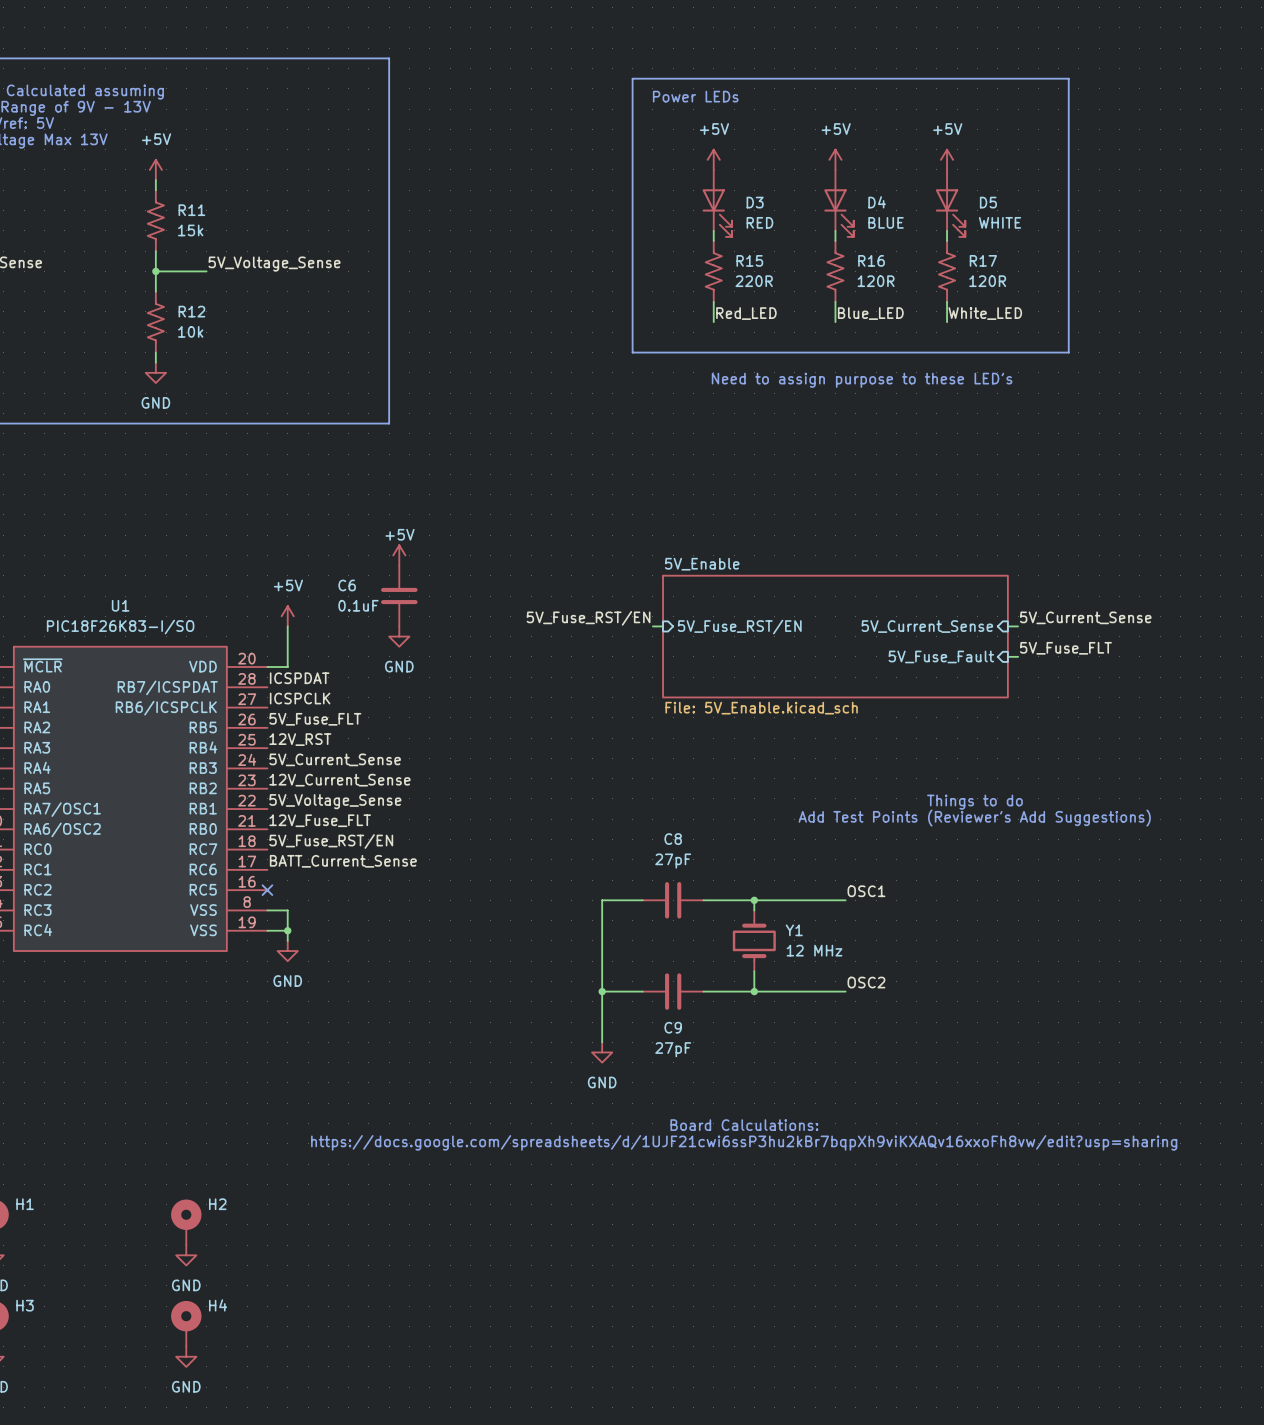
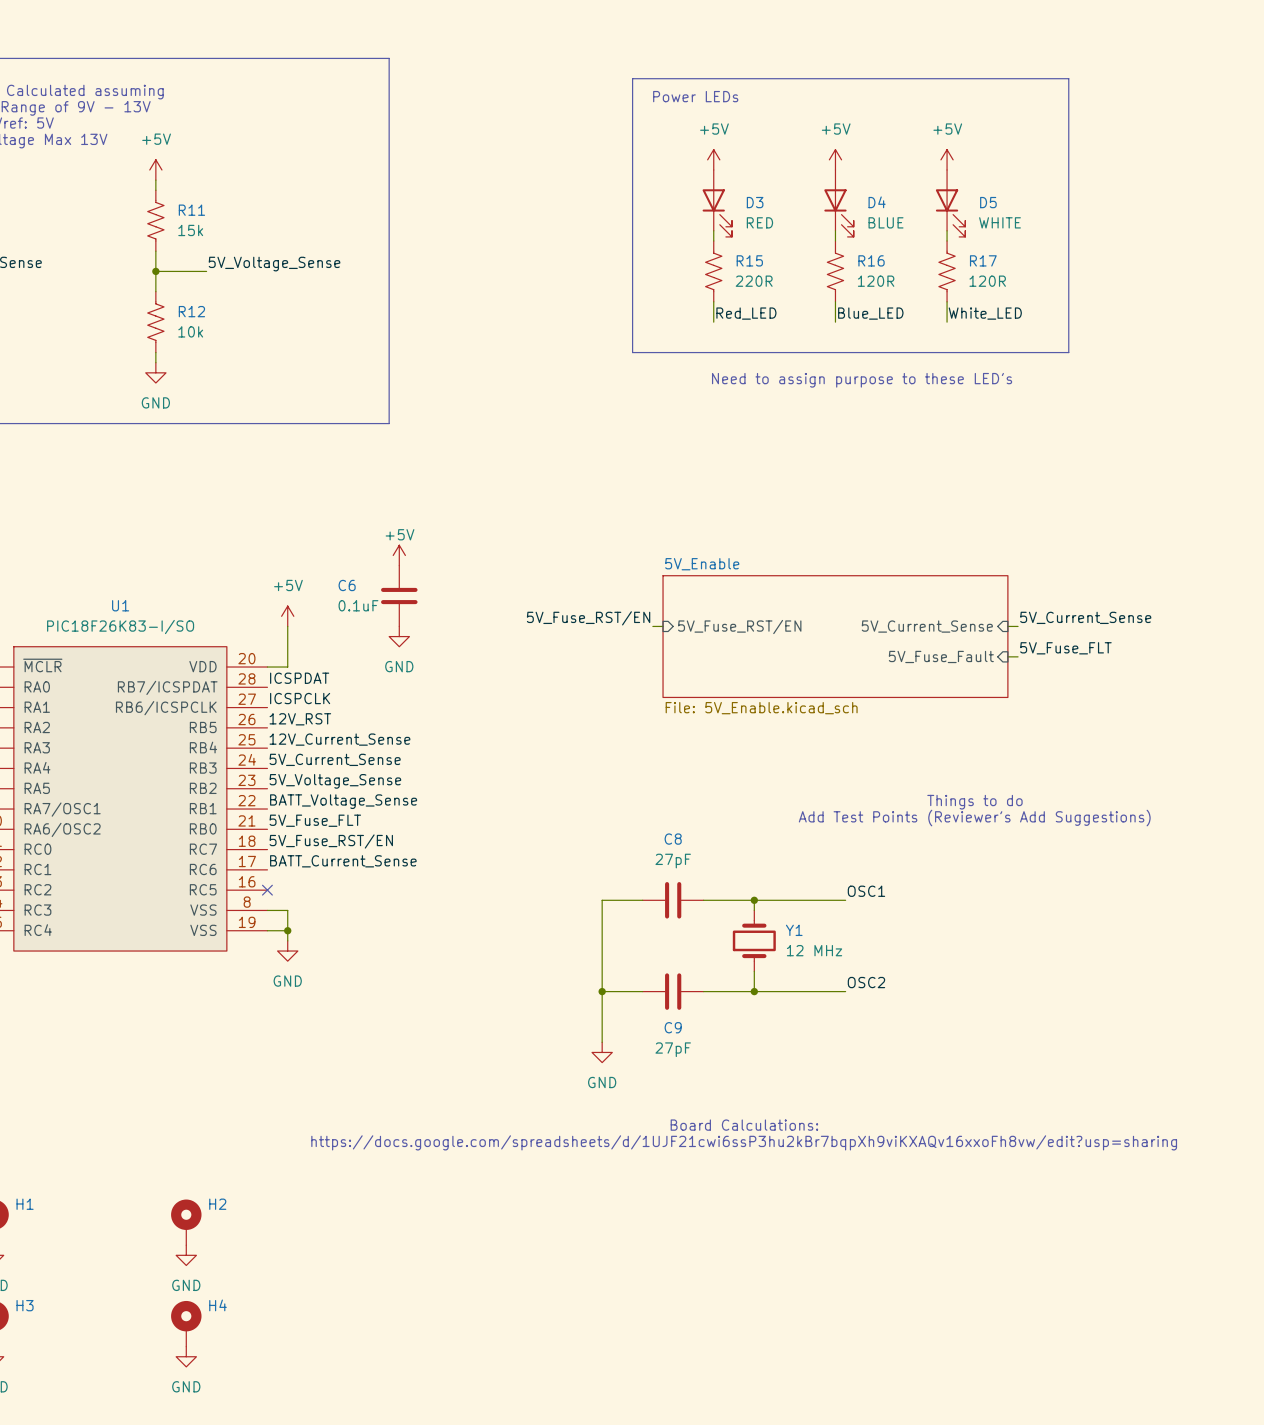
label: 5V_Fuse_FLT (315, 719) -> 12V_RST (300, 719)
label: 12V_RST (300, 739) -> 12V_Current_Sense (339, 739)
label: 12V_Current_Sense (339, 780) -> 5V_Voltage_Sense (335, 781)
label: 5V_Voltage_Sense (335, 801) -> BATT_Voltage_Sense (343, 801)
label: 12V_Fuse_FLT (320, 820) -> 5V_Fuse_FLT (315, 820)

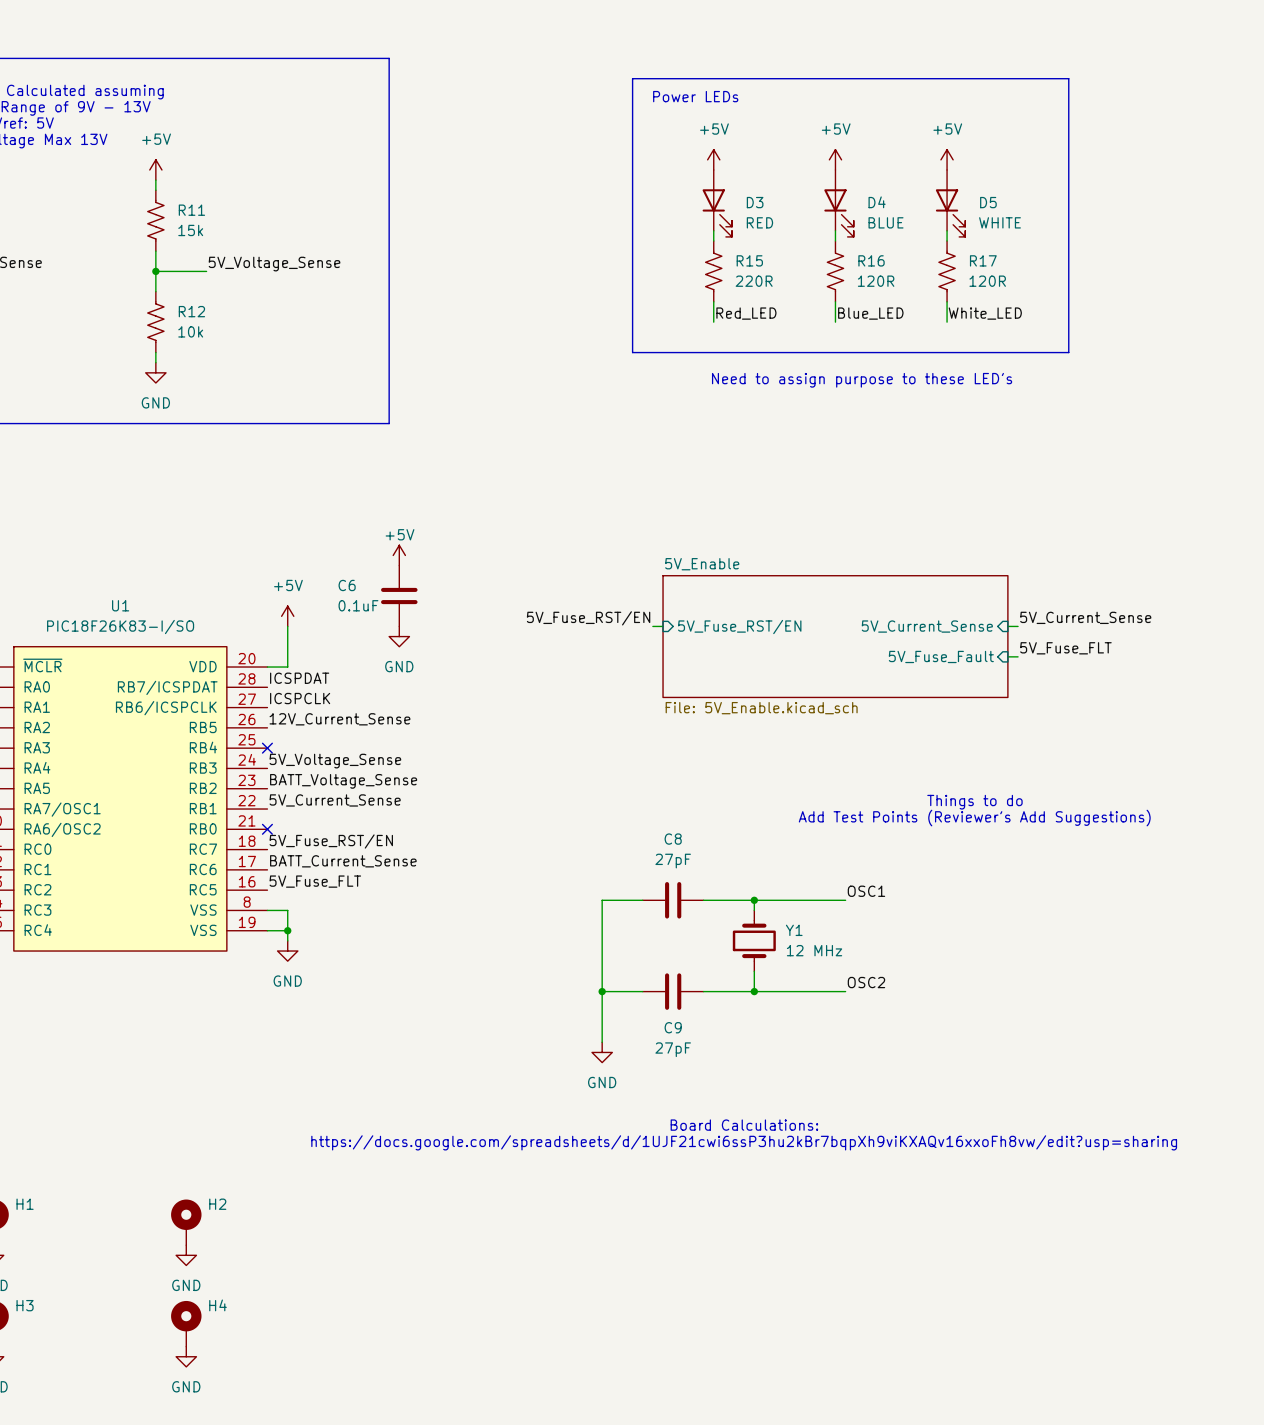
label: 12V_RST (300, 719) -> 12V_Current_Sense (339, 719)
label: 12V_Current_Sense (339, 739) -> none
no-connect mark: none -> (267, 748)
label: 5V_Current_Sense (335, 759) -> 5V_Voltage_Sense (335, 761)
label: 5V_Voltage_Sense (335, 781) -> BATT_Voltage_Sense (343, 781)
label: BATT_Voltage_Sense (343, 801) -> 5V_Current_Sense (335, 800)
label position: 5V_Fuse_FLT (315, 820) -> 5V_Fuse_FLT (315, 881)
no-connect mark: none -> (267, 829)
no-connect mark: (267, 890) -> none

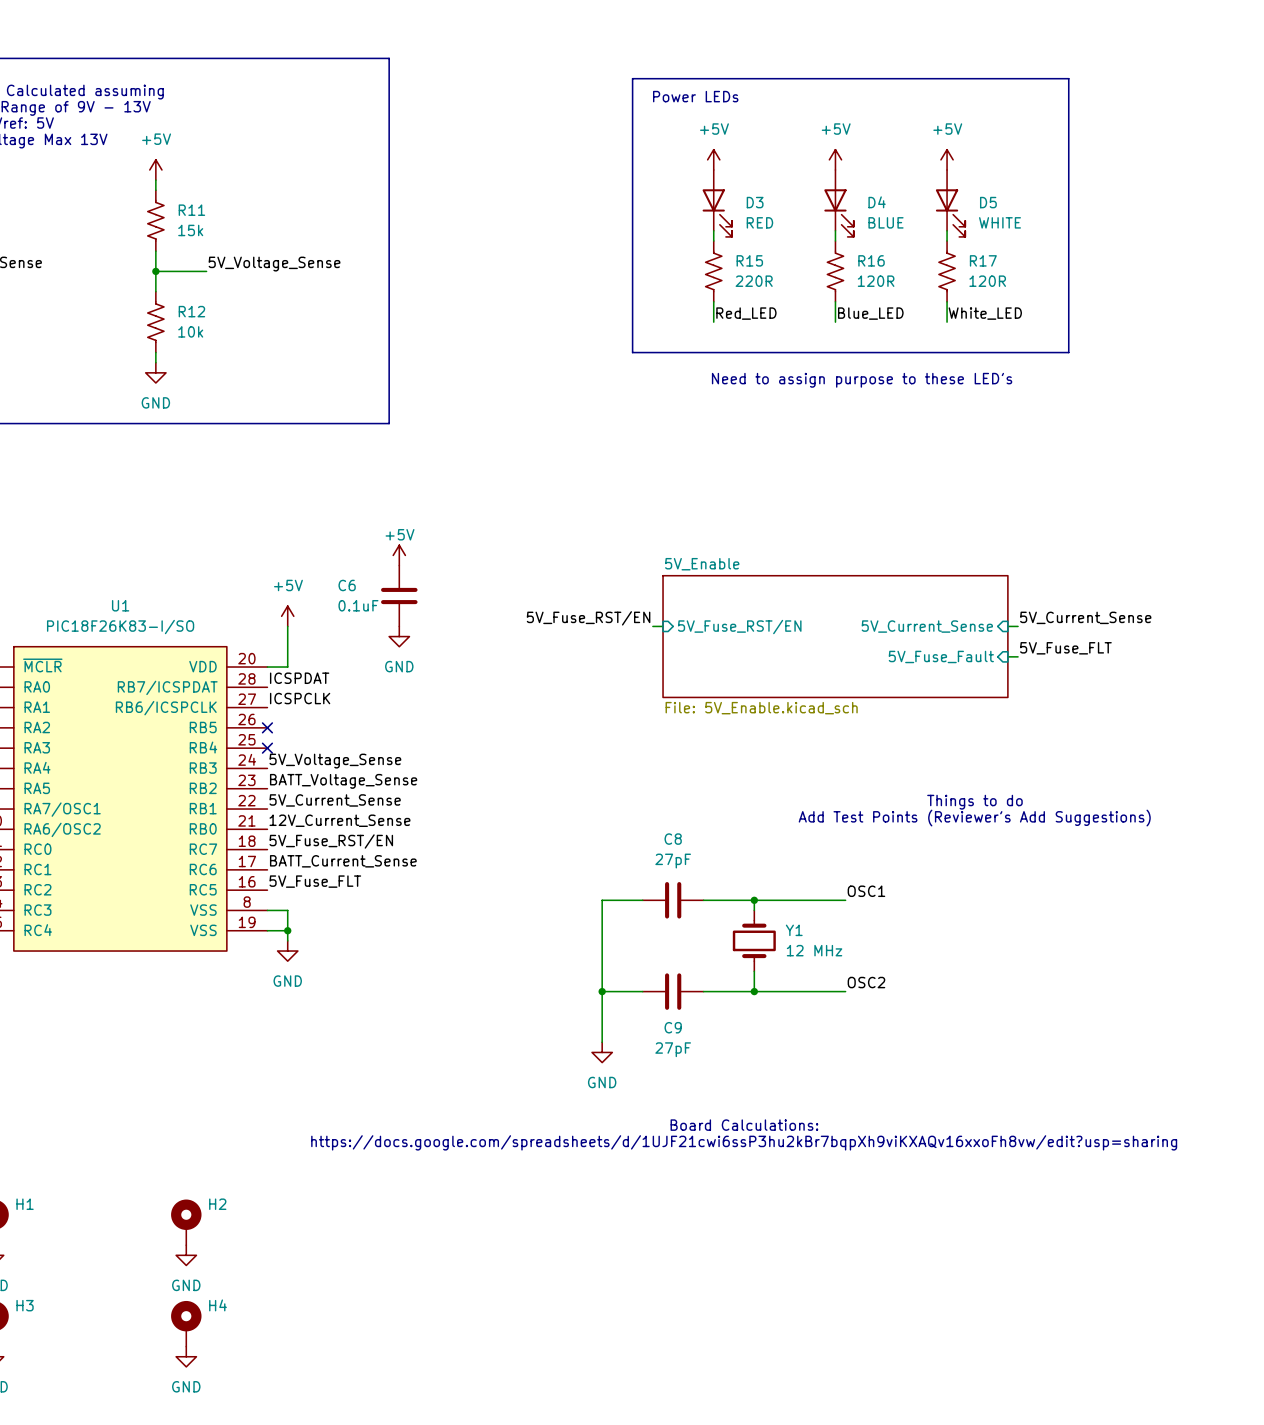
label position: 12V_Current_Sense (339, 719) -> 12V_Current_Sense (339, 820)
no-connect mark: none -> (267, 727)
no-connect mark: (267, 829) -> none

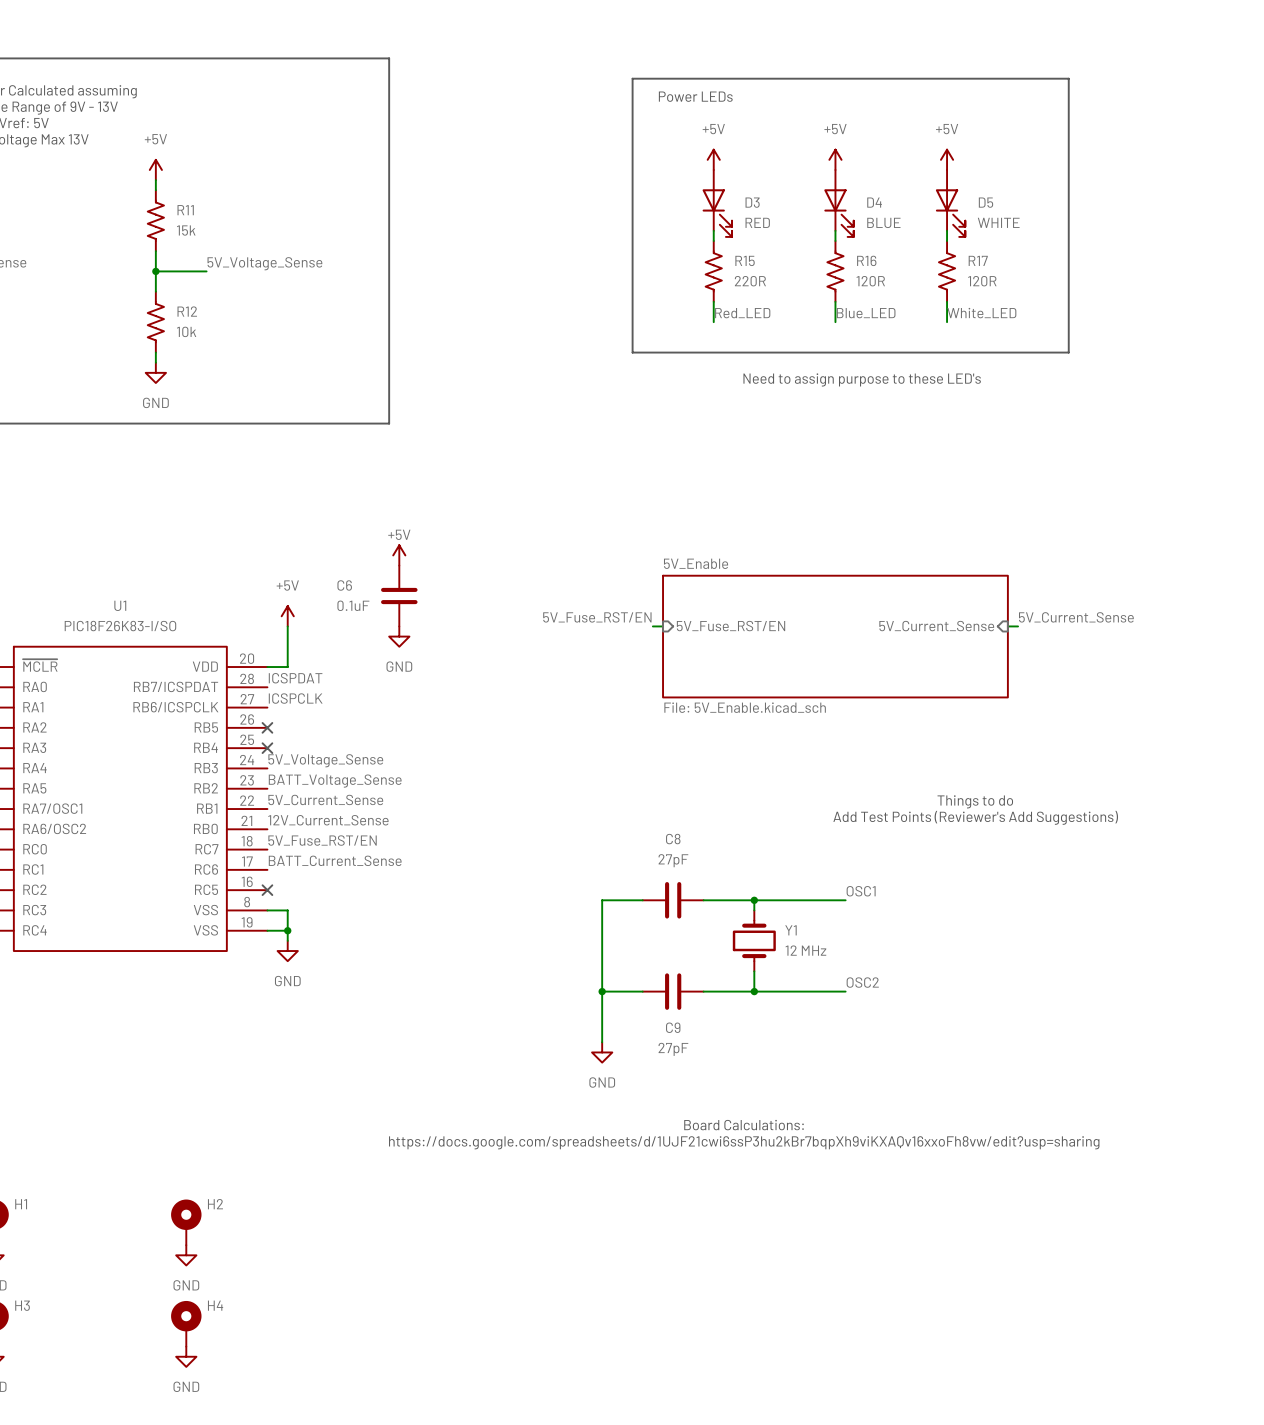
label: 5V_Fuse_FLT (1065, 648) -> none
sheet pin: 5V_Fuse_Fault (941, 656) -> none
wire: (1007, 656) (1018, 656) -> none
label: 5V_Fuse_FLT (315, 881) -> none
no-connect mark: none -> (267, 890)

